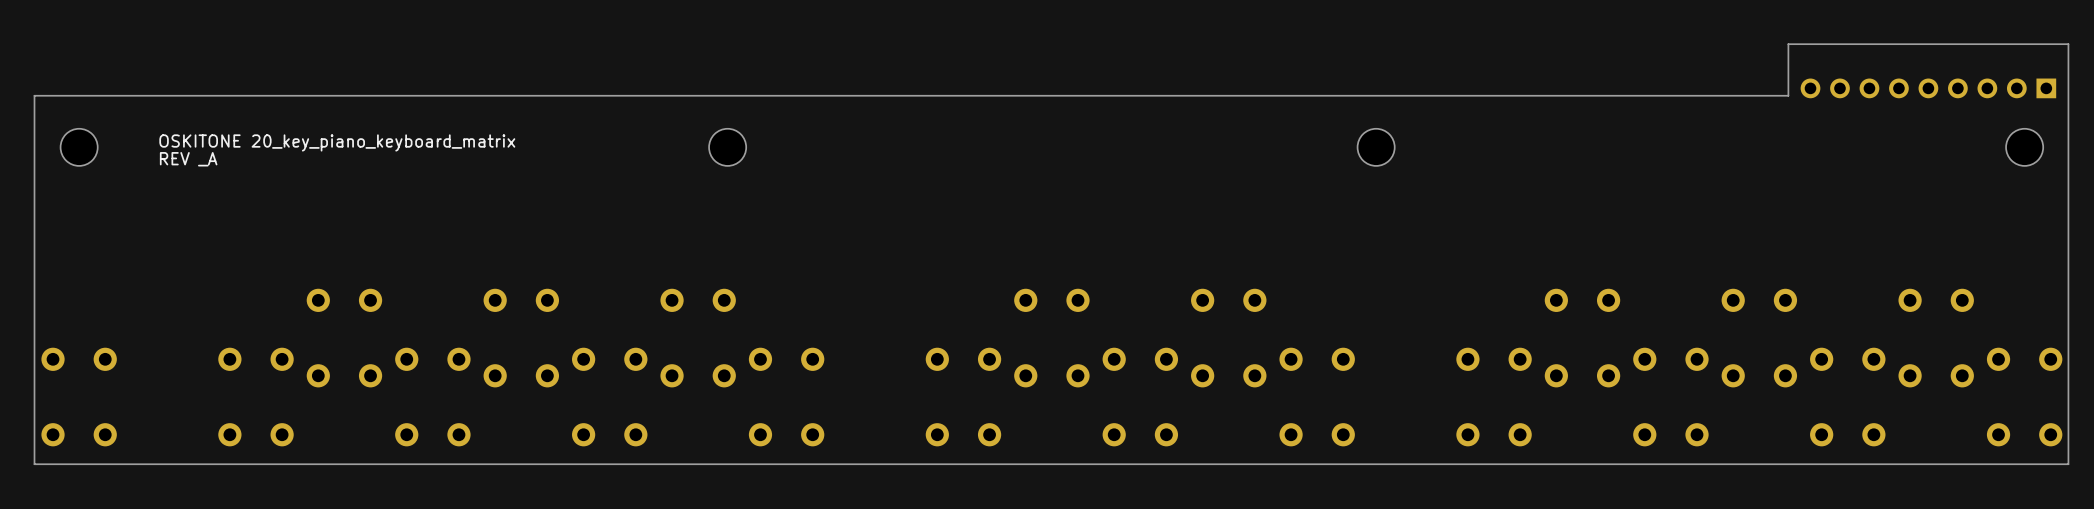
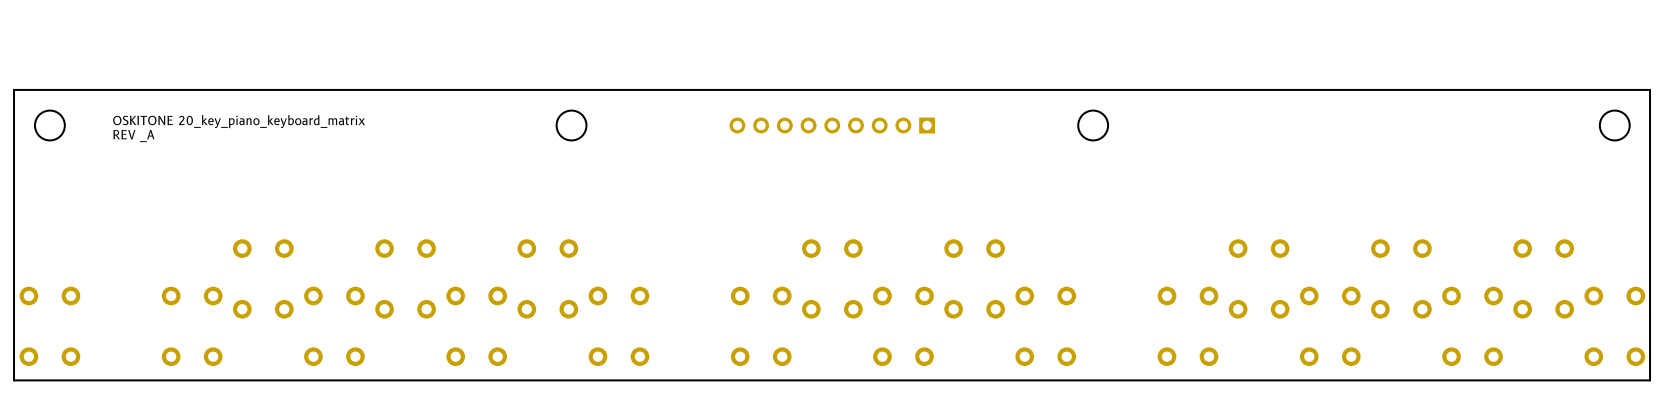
part: (1928, 88) -> none
board edge: (2068, 103) (2068, 44) (1788, 44) (1788, 95) (34, 95) (34, 103) -> (1650, 89) (14, 89)
part: none -> (832, 125)

